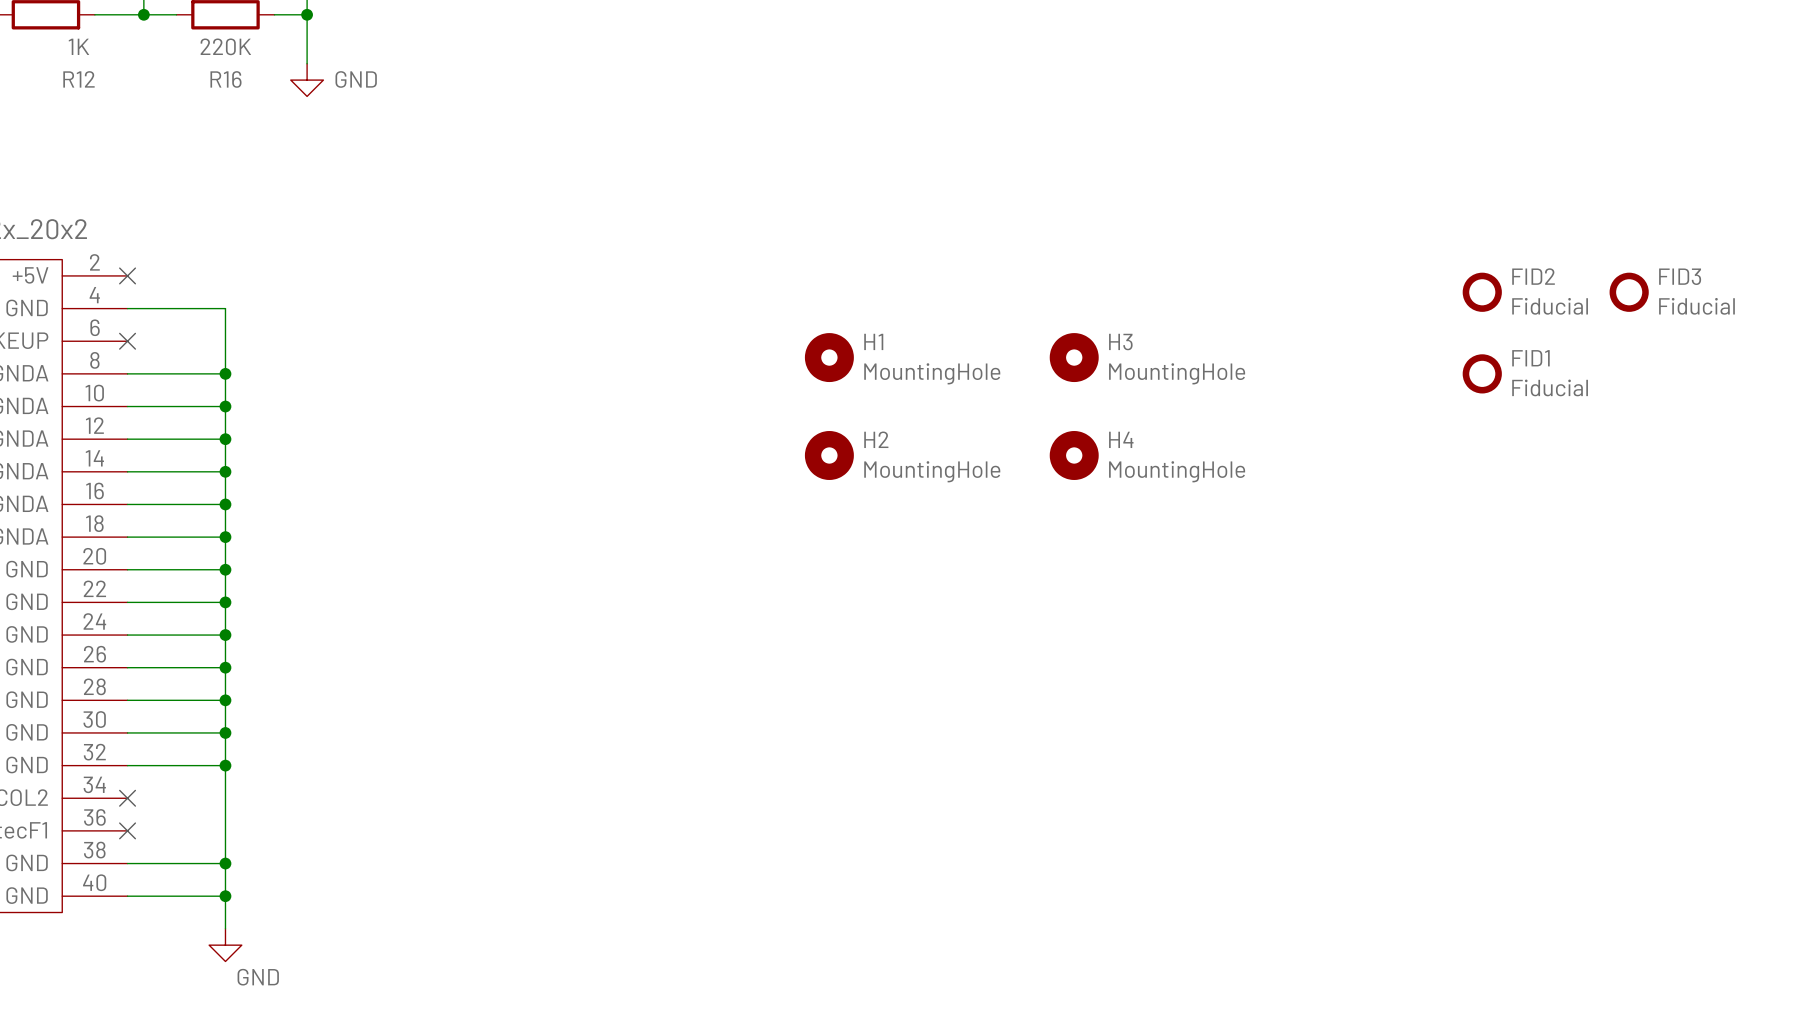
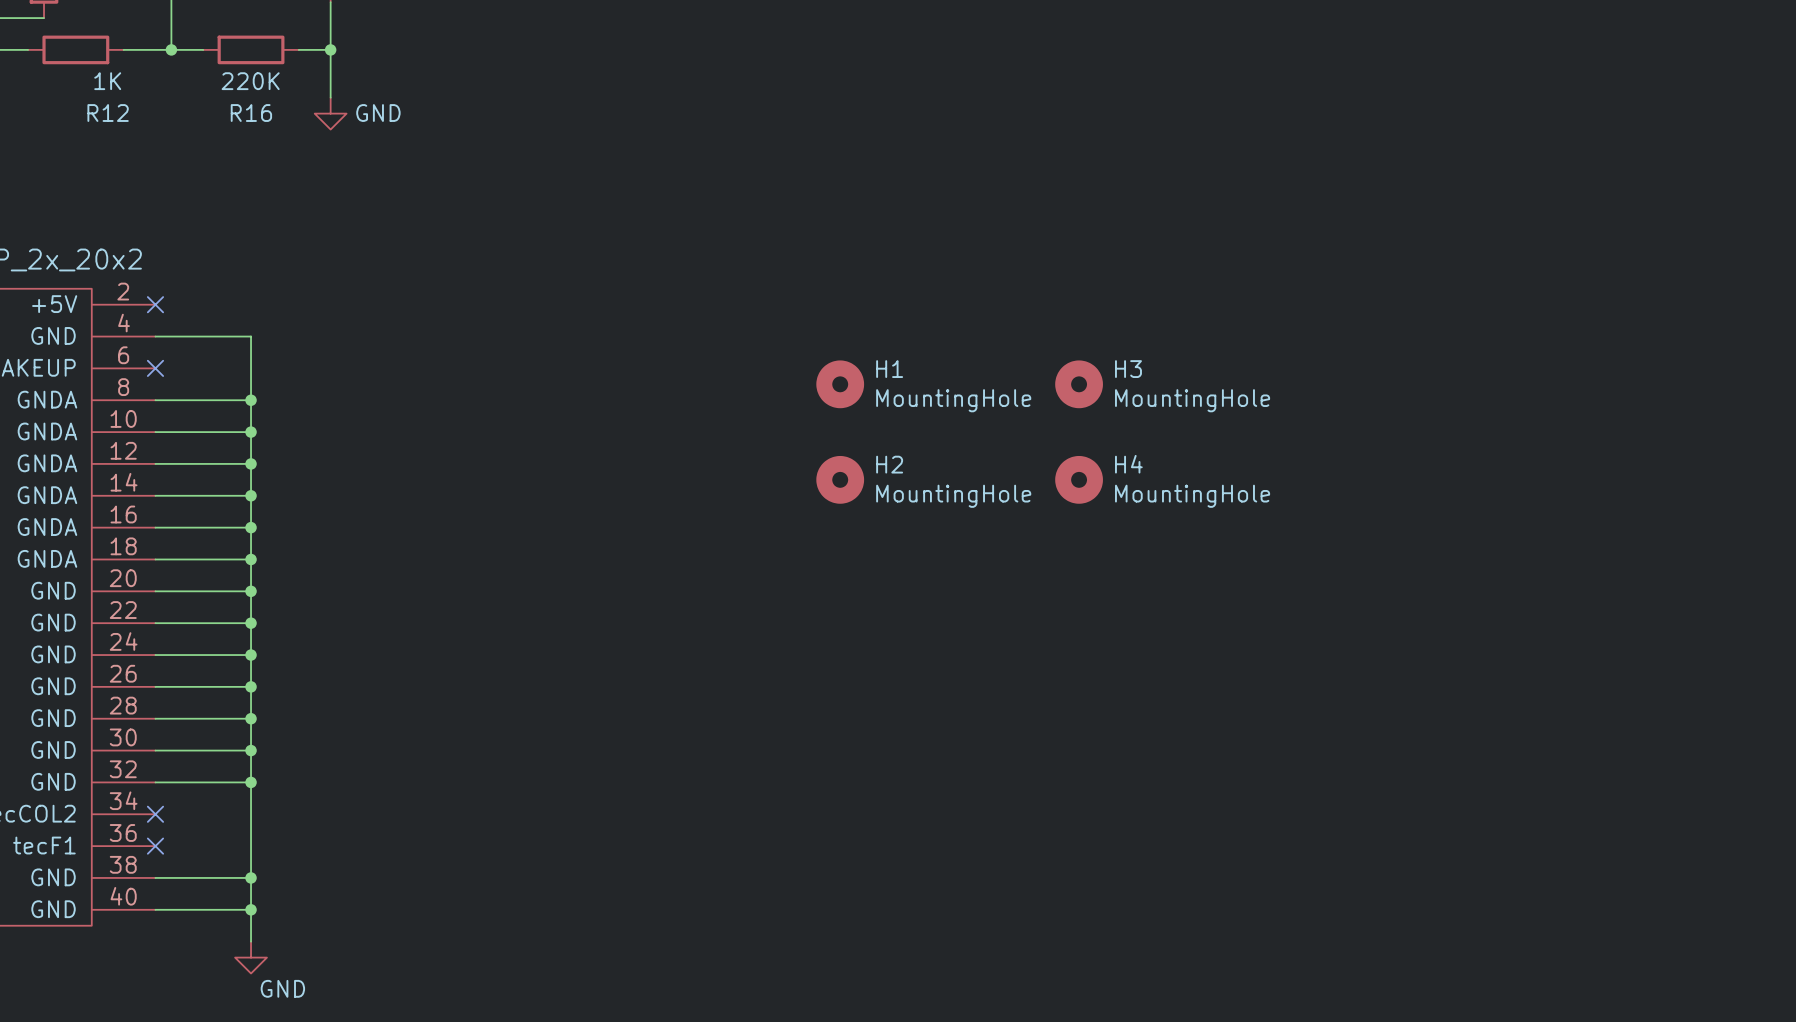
FID2: Fiducial (1482, 292) -> none
FID3: Fiducial (1629, 292) -> none
FID1: Fiducial (1482, 373) -> none

